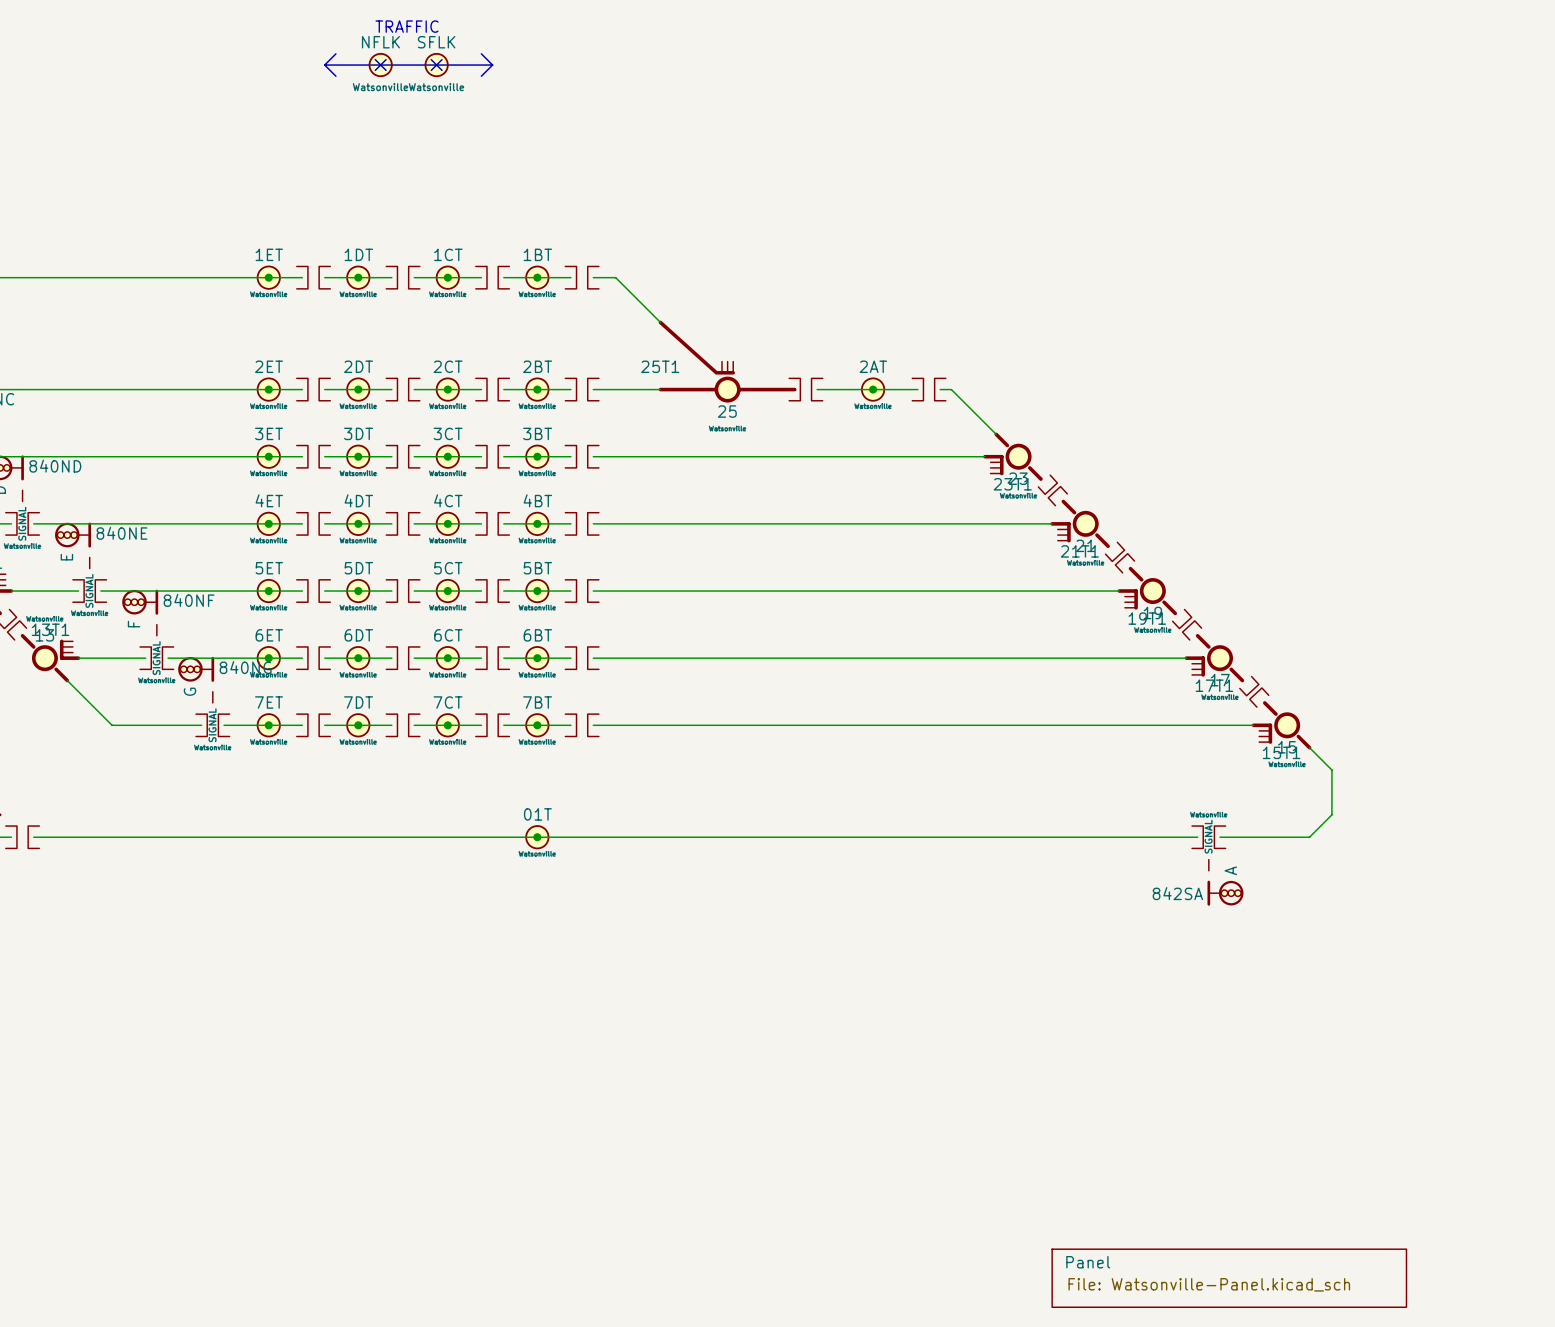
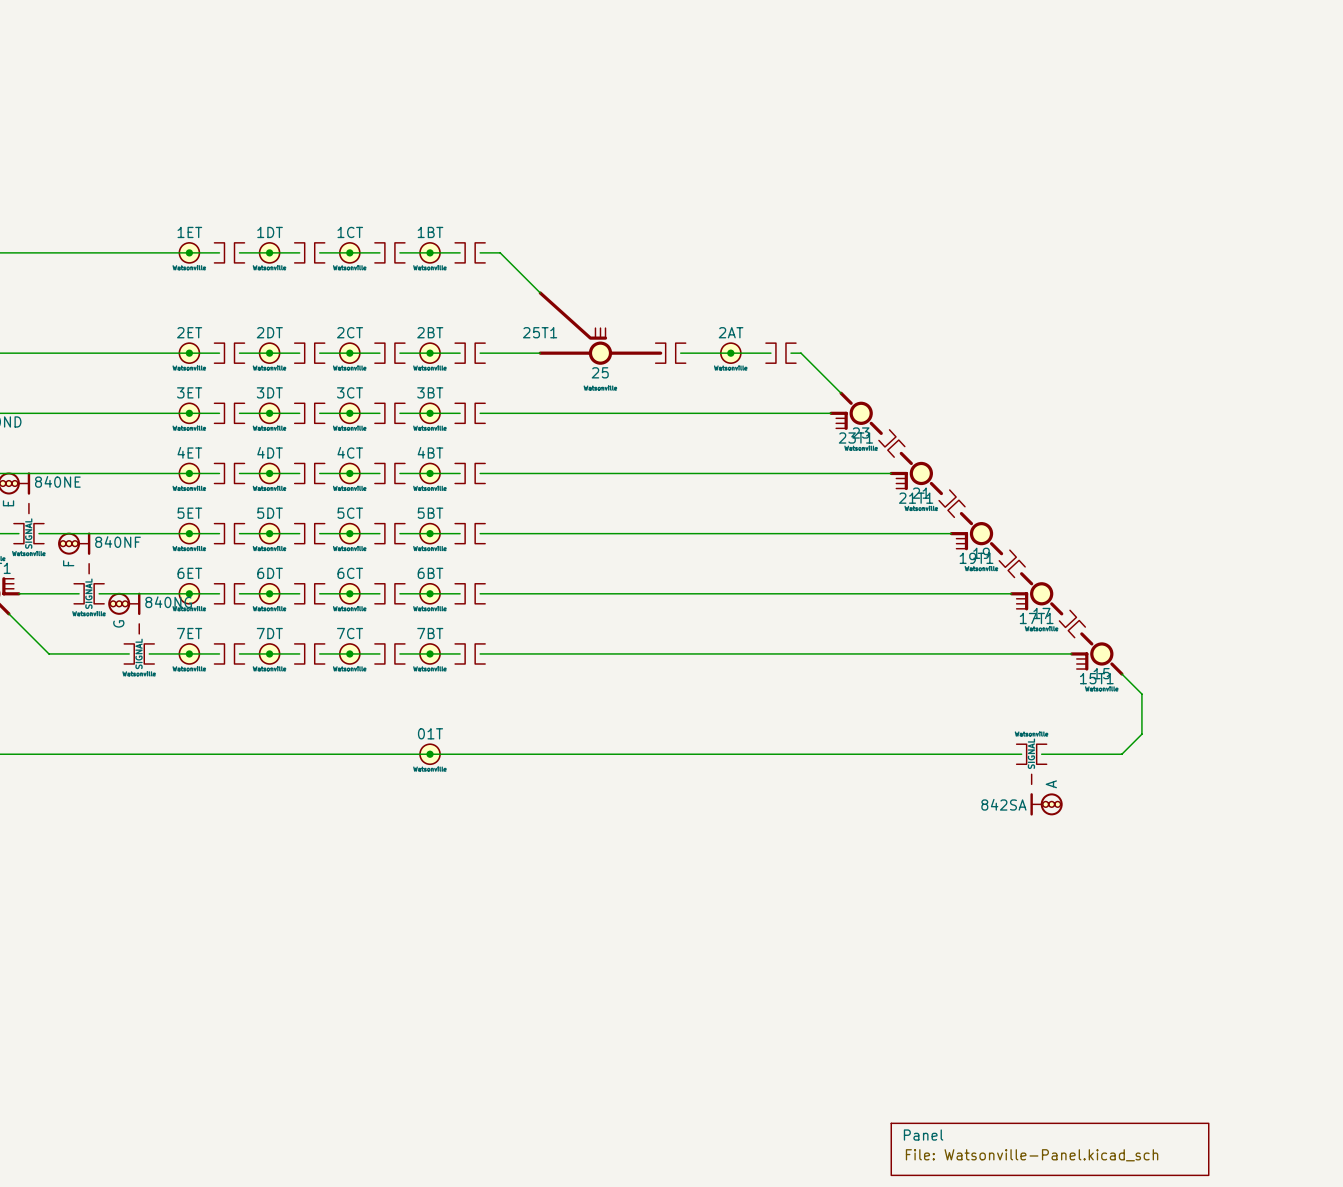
text: TRAFFIC (407, 26) -> none
line: (335, 53) (324, 65) -> none
line: (481, 53) (492, 65) -> none
line: (324, 65) (335, 76) -> none
line: (324, 65) (492, 65) -> none
no-connect mark: (380, 65) -> none
part: NFLK (380, 65) -> none
no-connect mark: (436, 65) -> none
part: SFLK (436, 65) -> none
line: (492, 65) (481, 76) -> none

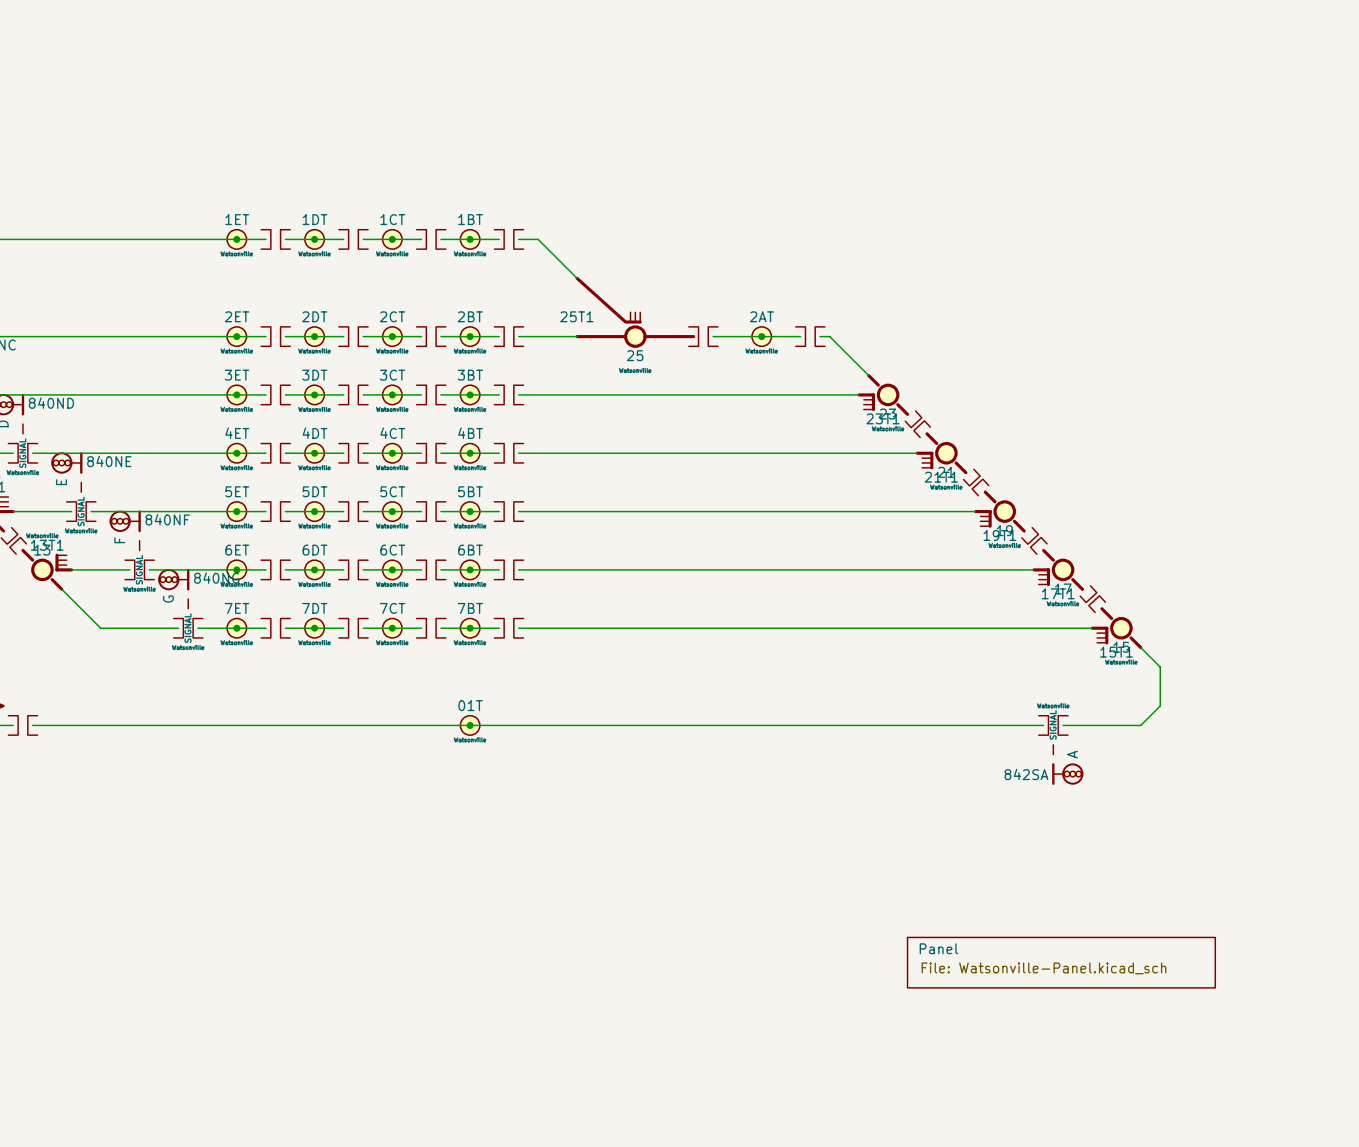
sheet Panel position: (1050, 1149) -> (1061, 962)

